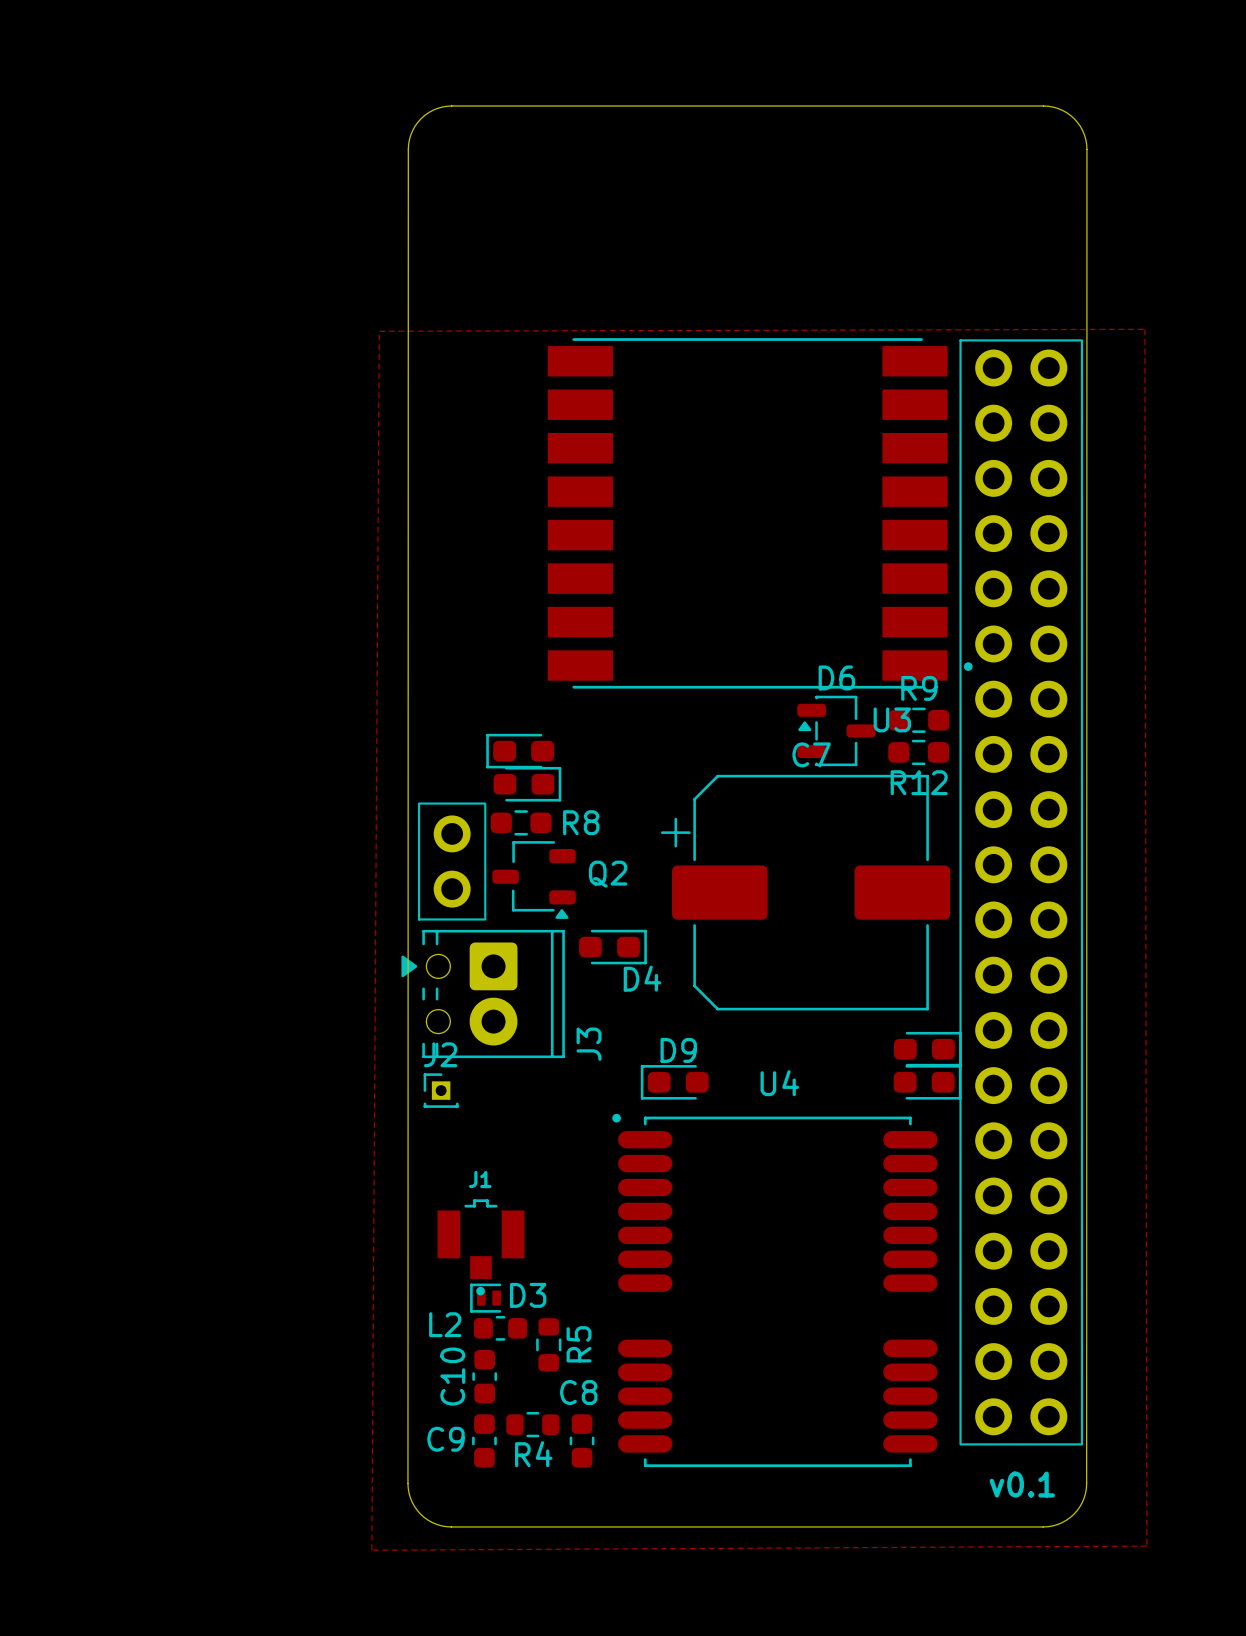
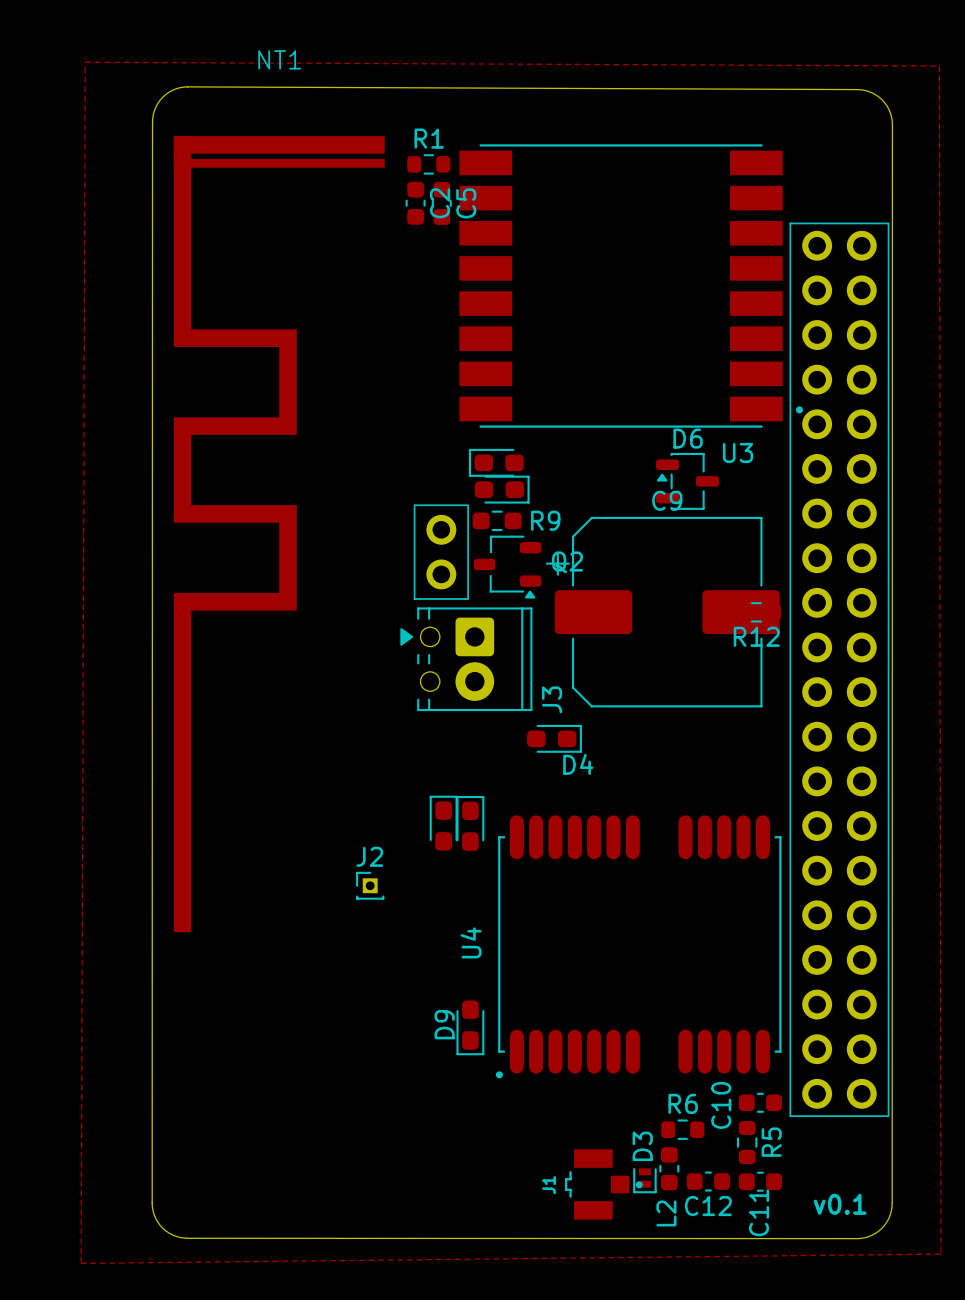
board edge: (1043, 105) (446, 106) (432, 110) (421, 118) (412, 130) (408, 149) (407, 1483) (412, 1502) (420, 1514) (428, 1520) (437, 1524) (451, 1526) (1043, 1526) -> (152, 122) (152, 1203) (157, 1221) (168, 1232) (187, 1238) (856, 1238)
board edge: none -> (857, 89) (187, 86) (172, 90) (162, 97) (156, 106) (152, 122)
R1: none -> (428, 164)
C2: none -> (415, 203)
C5: none -> (441, 203)
zone outline: (1144, 329) (379, 331) (371, 1550) (1146, 1546) (1144, 329) -> (85, 62) (81, 1263) (940, 1254) (939, 65) (85, 62)
U3 position: (760, 513) -> (631, 285)
part: none -> (496, 462)
part: none -> (502, 489)
NT1: none -> (279, 534)
R9 name position: R9 (919, 688) -> R9 (545, 520)
R9 position: (918, 720) -> (497, 520)
D6 position: (836, 730) -> (687, 481)
part: (520, 751) -> none
part: (527, 784) -> none
R8: (521, 822) -> none
part position: (452, 861) -> (441, 552)
Q2 position: (534, 880) -> (507, 567)
C7: (805, 892) -> none
part position: (1021, 892) -> (839, 669)
D4 position: (612, 947) -> (554, 738)
J3 position: (483, 993) -> (466, 659)
part: none -> (443, 823)
part: none -> (470, 823)
part: (927, 1049) -> none
D9 rotation: 0° (674, 1082) -> 90° counterclockwise (470, 1027)
D9 position: (674, 1082) -> (470, 1027)
part: (927, 1082) -> none
J1 rotation: 0° (480, 1247) -> 90° counterclockwise (603, 1184)
J1 position: (480, 1247) -> (603, 1184)
U4 rotation: 0° (774, 1290) -> 90° counterclockwise (638, 946)
D3 rotation: 0° (485, 1298) -> 90° counterclockwise (644, 1180)
D3 position: (485, 1298) -> (644, 1180)
L2 name position: L2 (445, 1324) -> L2 (666, 1213)
L2 rotation: 0° (500, 1328) -> 90° clockwise (669, 1168)
L2 position: (500, 1328) -> (669, 1168)
R5 position: (548, 1344) -> (747, 1142)
C10 rotation: 0° (484, 1376) -> 90° clockwise (760, 1102)
C10 position: (484, 1376) -> (760, 1102)
R6: none -> (682, 1129)
C9 footprint: [472, 1414, 497, 1468] -> [545, 516, 780, 708]
R4: (532, 1424) -> none
C9 name position: C9 (445, 1439) -> C9 (667, 500)
C8: (582, 1440) -> none
C12: none -> (708, 1181)
C11: none -> (760, 1181)

